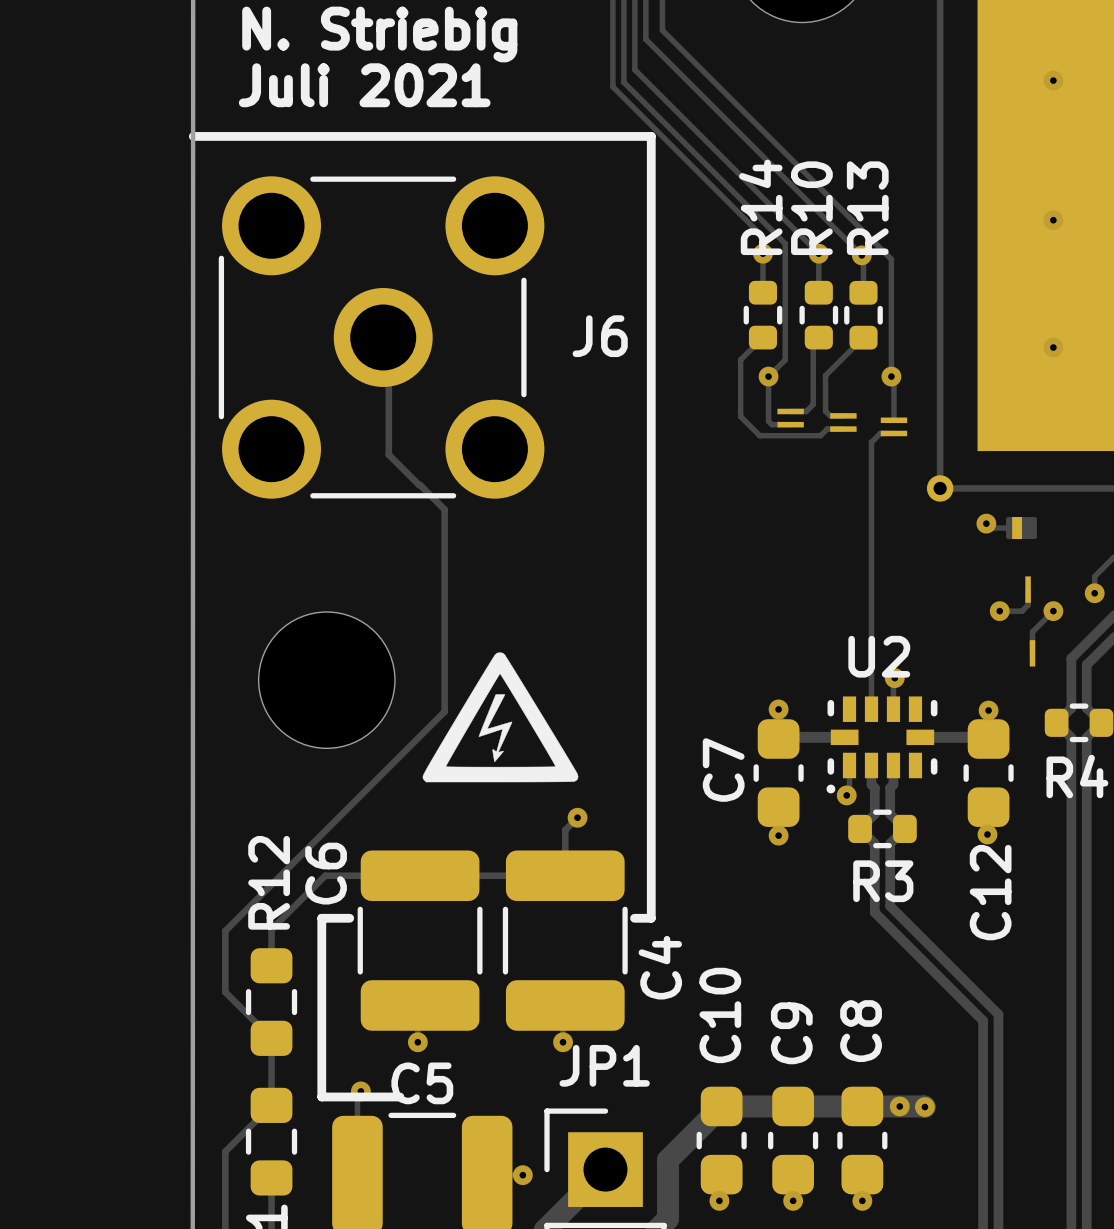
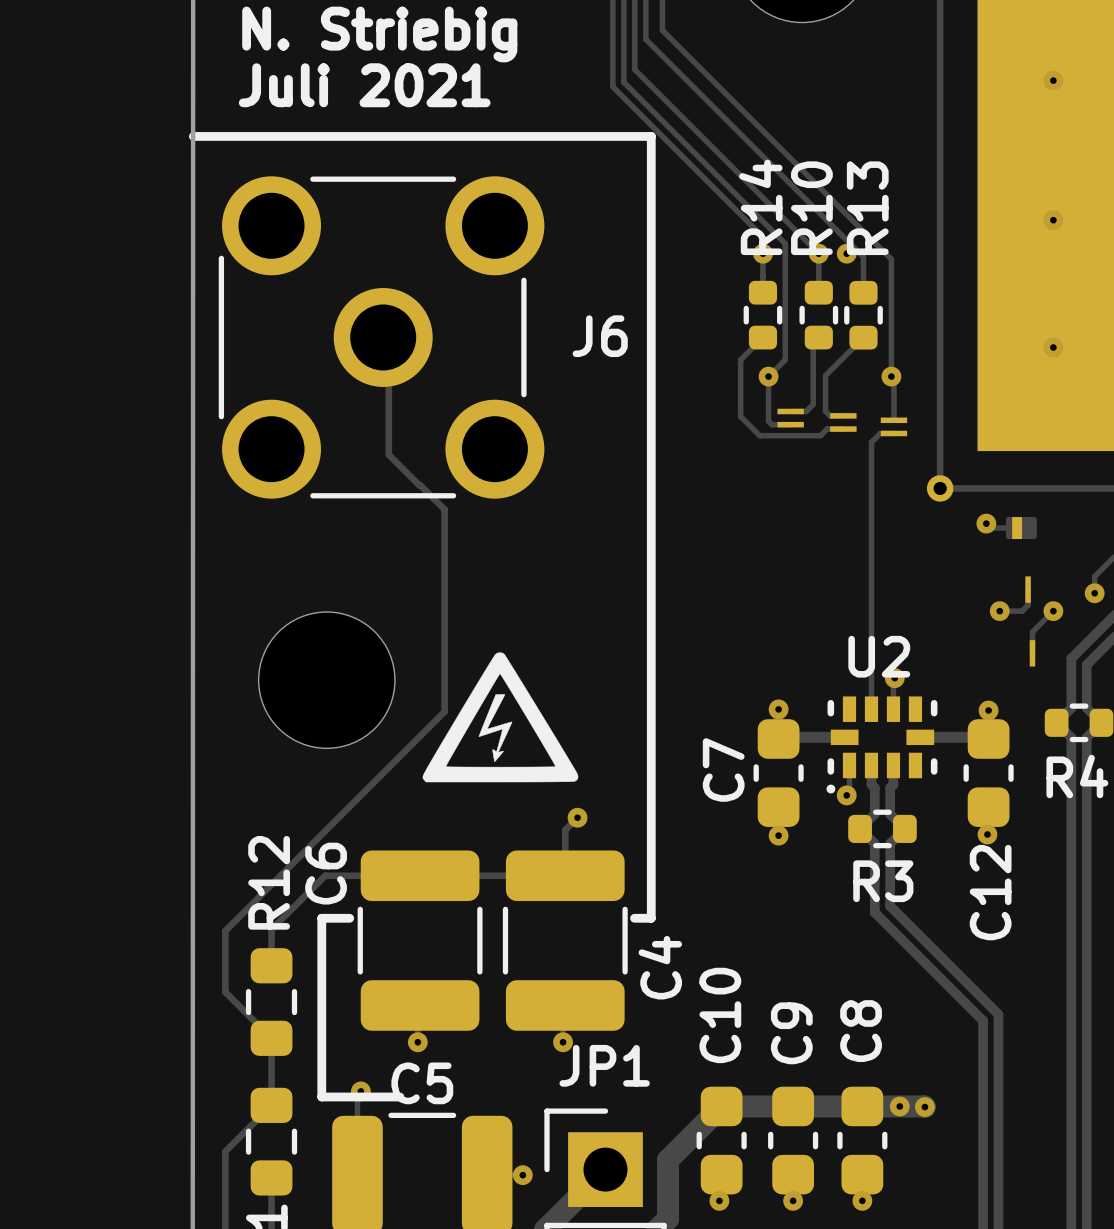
via position: (861, 255) -> (846, 253)

